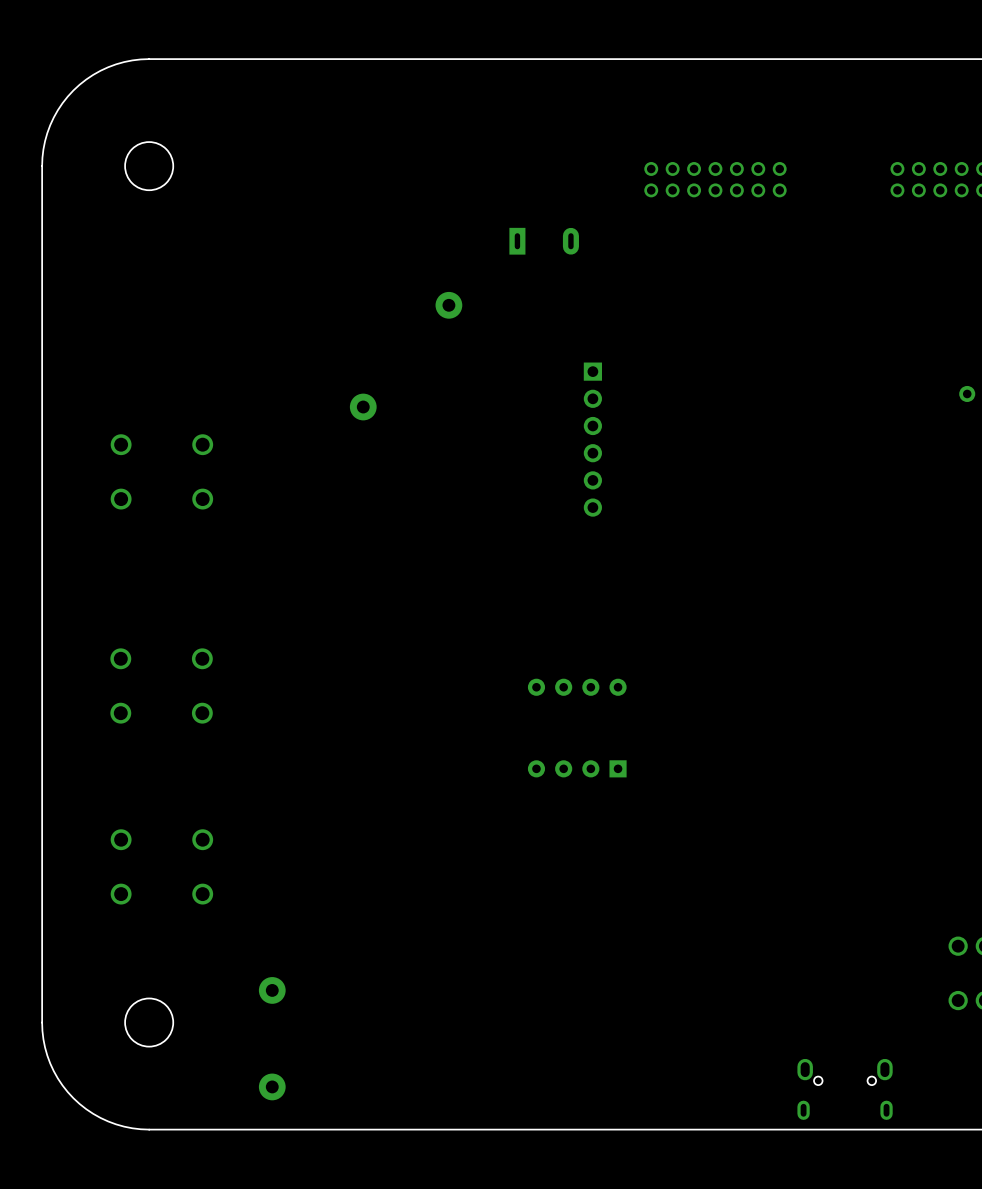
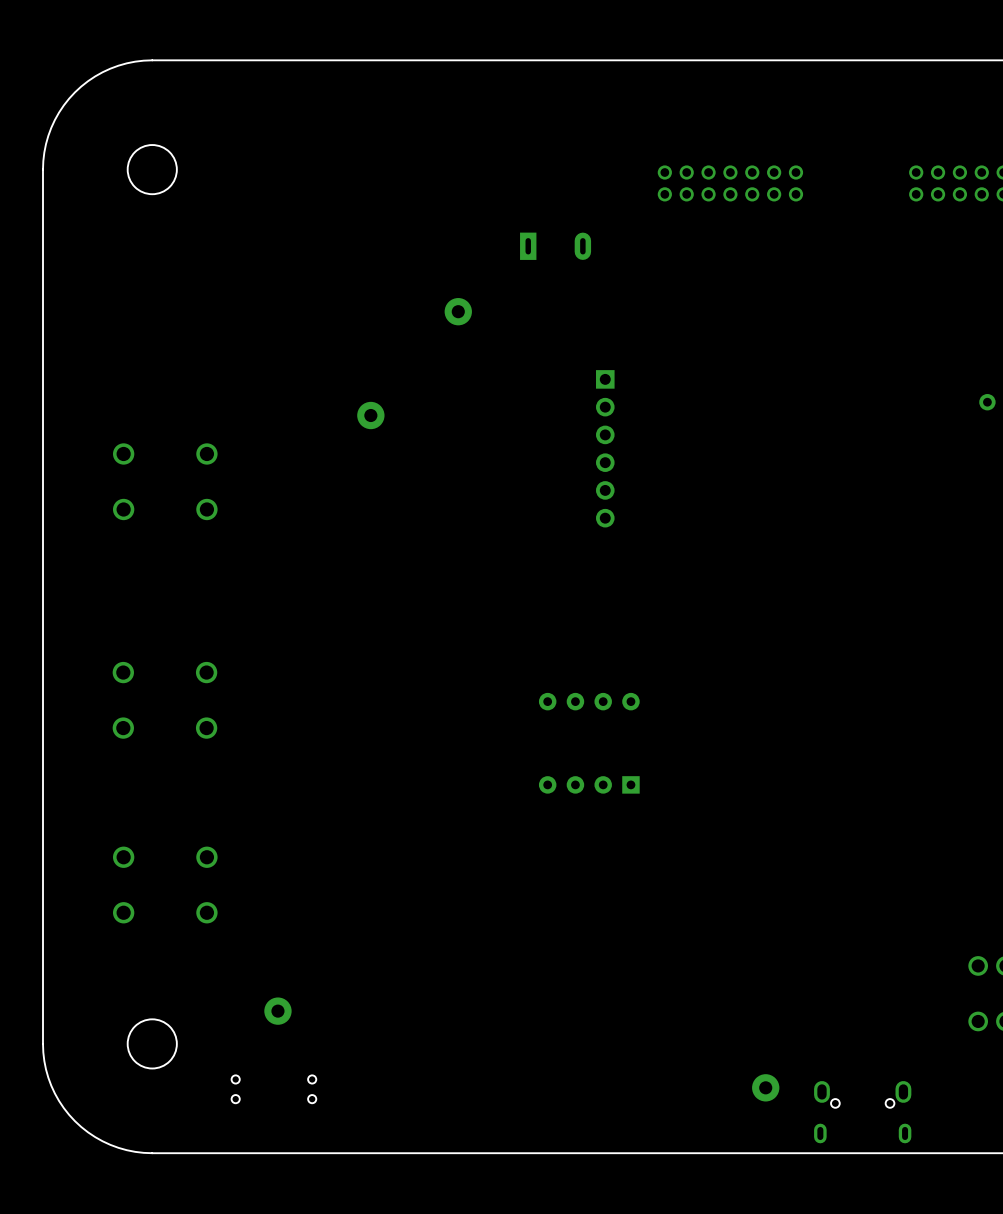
part: none -> (765, 1087)
part: none -> (235, 1089)
part: none -> (312, 1089)
part: (272, 1086) -> none

